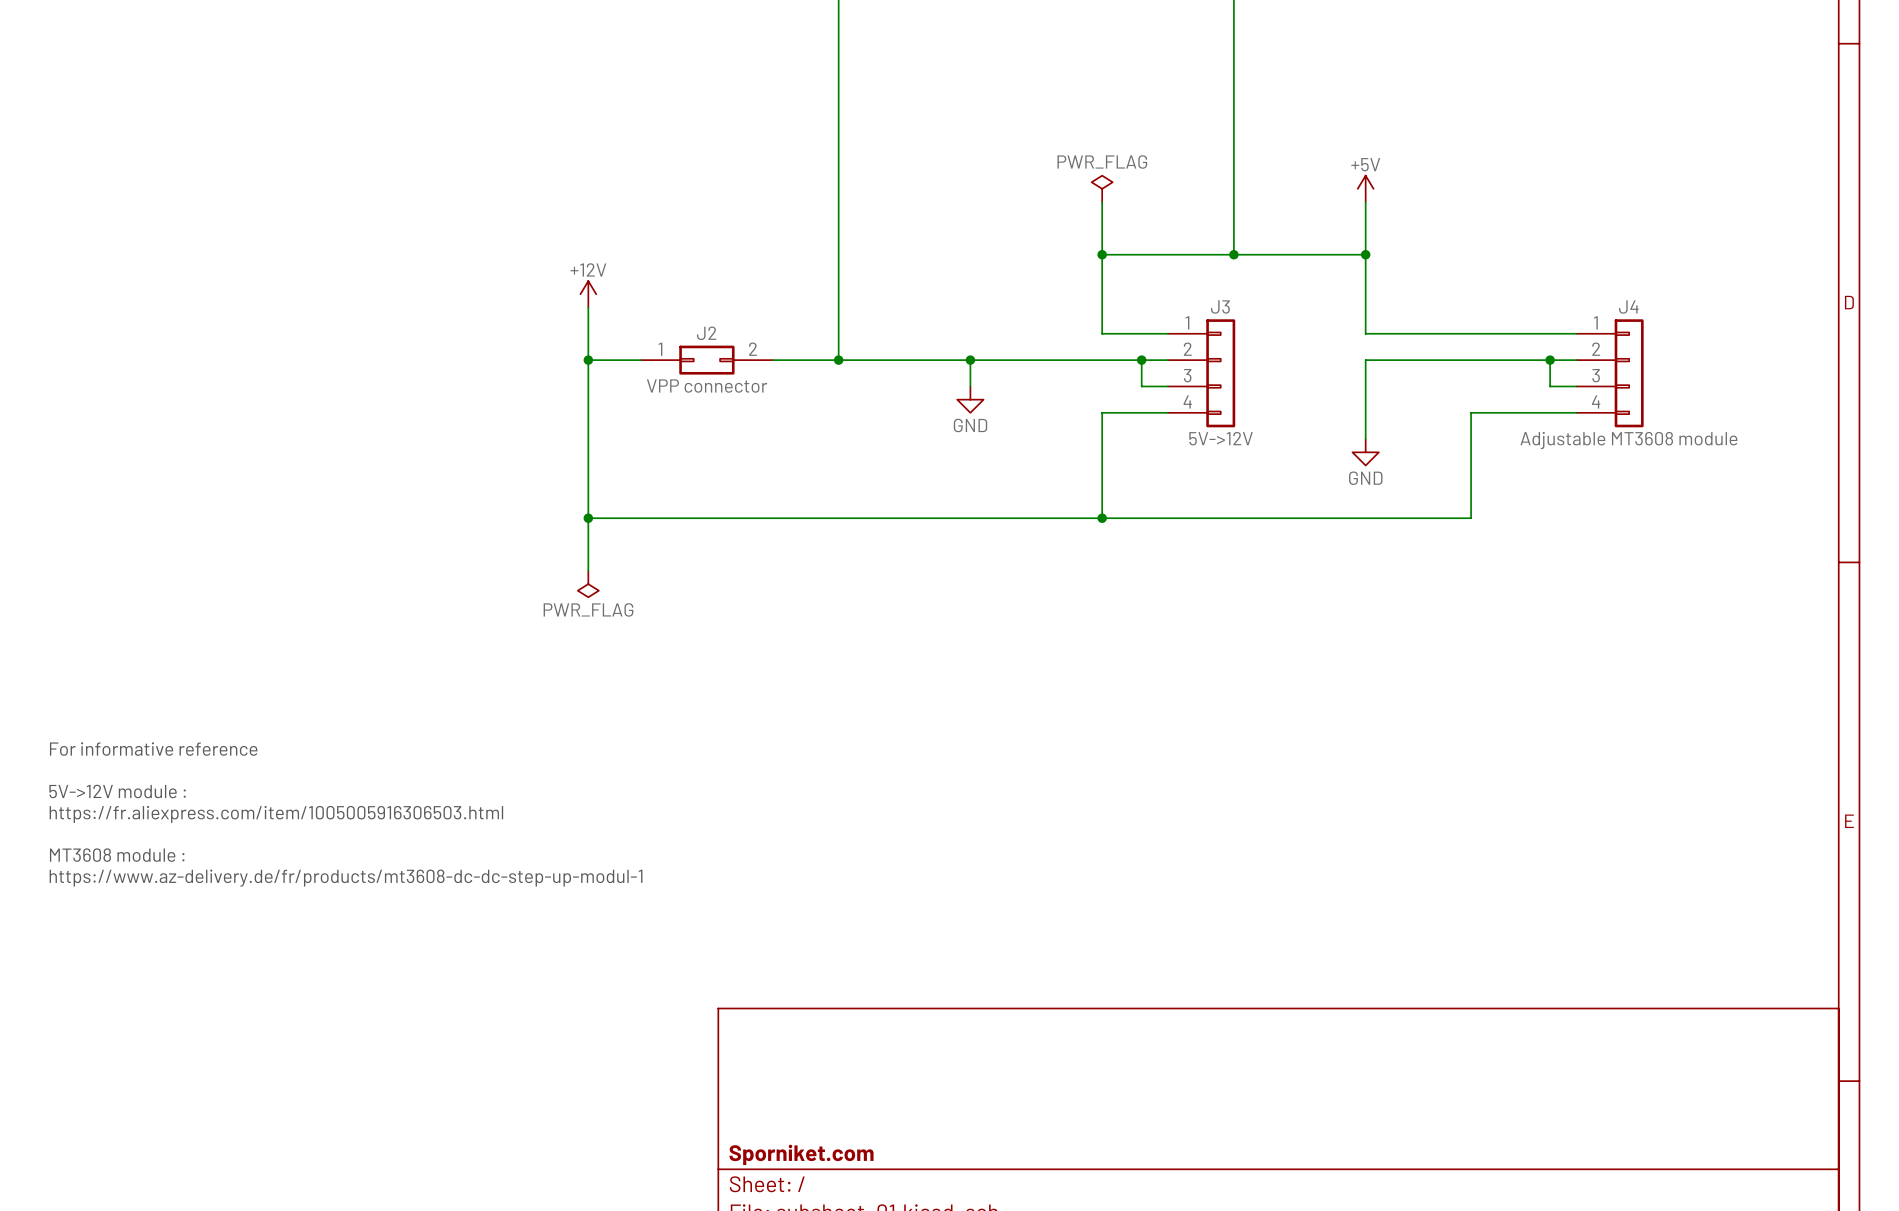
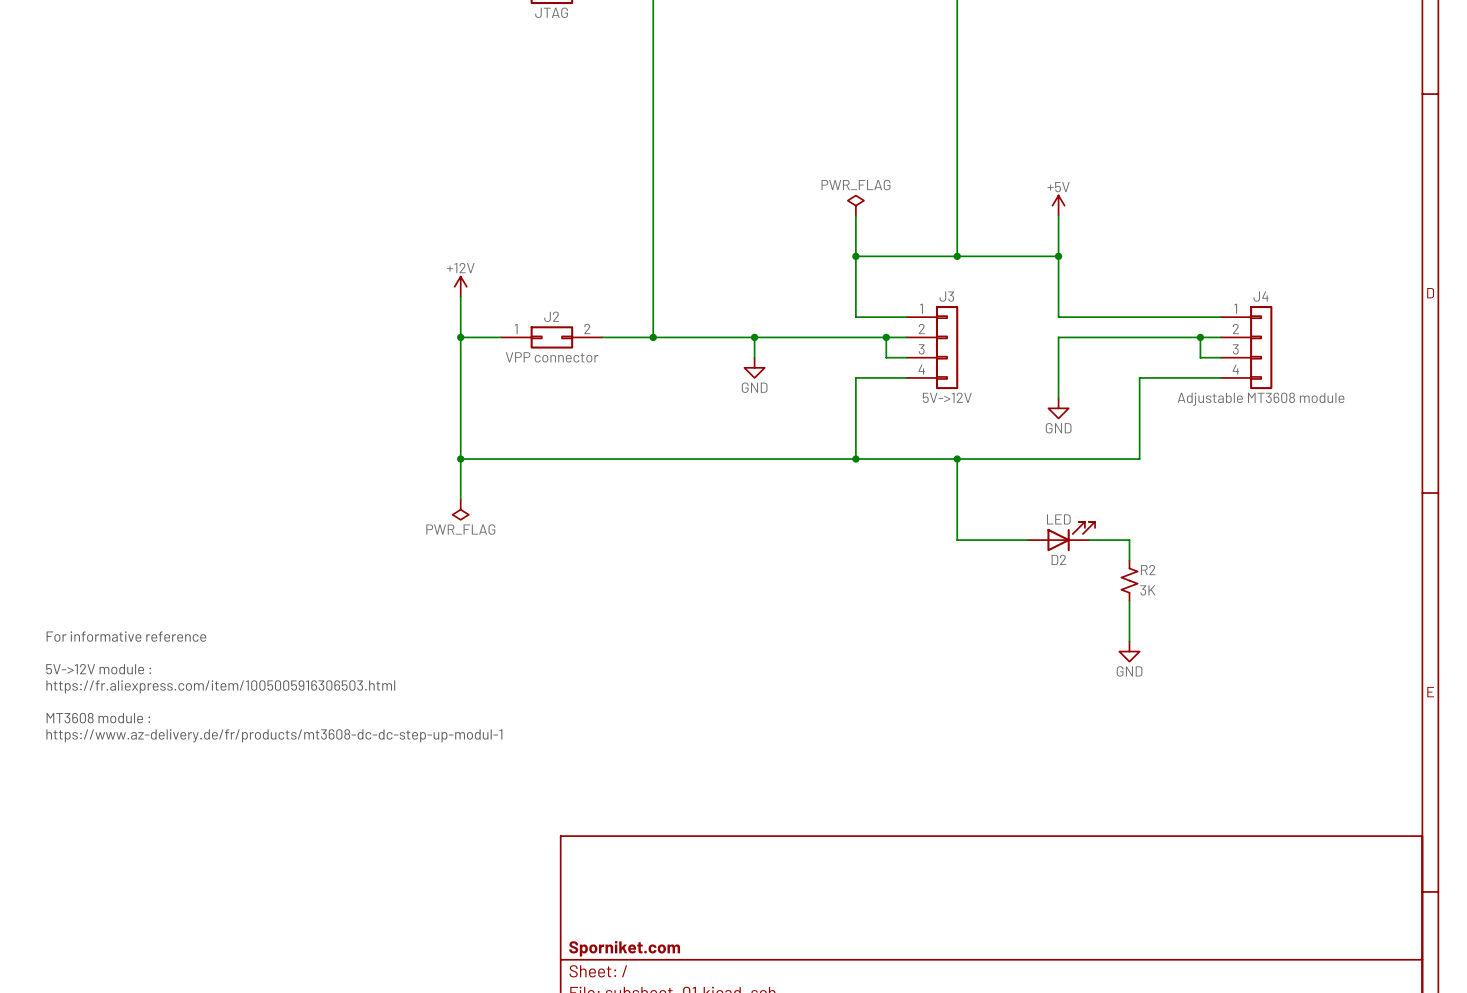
wire: none -> (957, 459) (957, 540) (1028, 540)
junction: none -> (957, 459)
D2: none -> LED (1061, 536)
wire: none -> (1088, 540) (1129, 540) (1129, 560)
R2: none -> 3K (1129, 580)
wire: none -> (1129, 600) (1129, 641)
power symbol: none -> GND (1129, 651)

